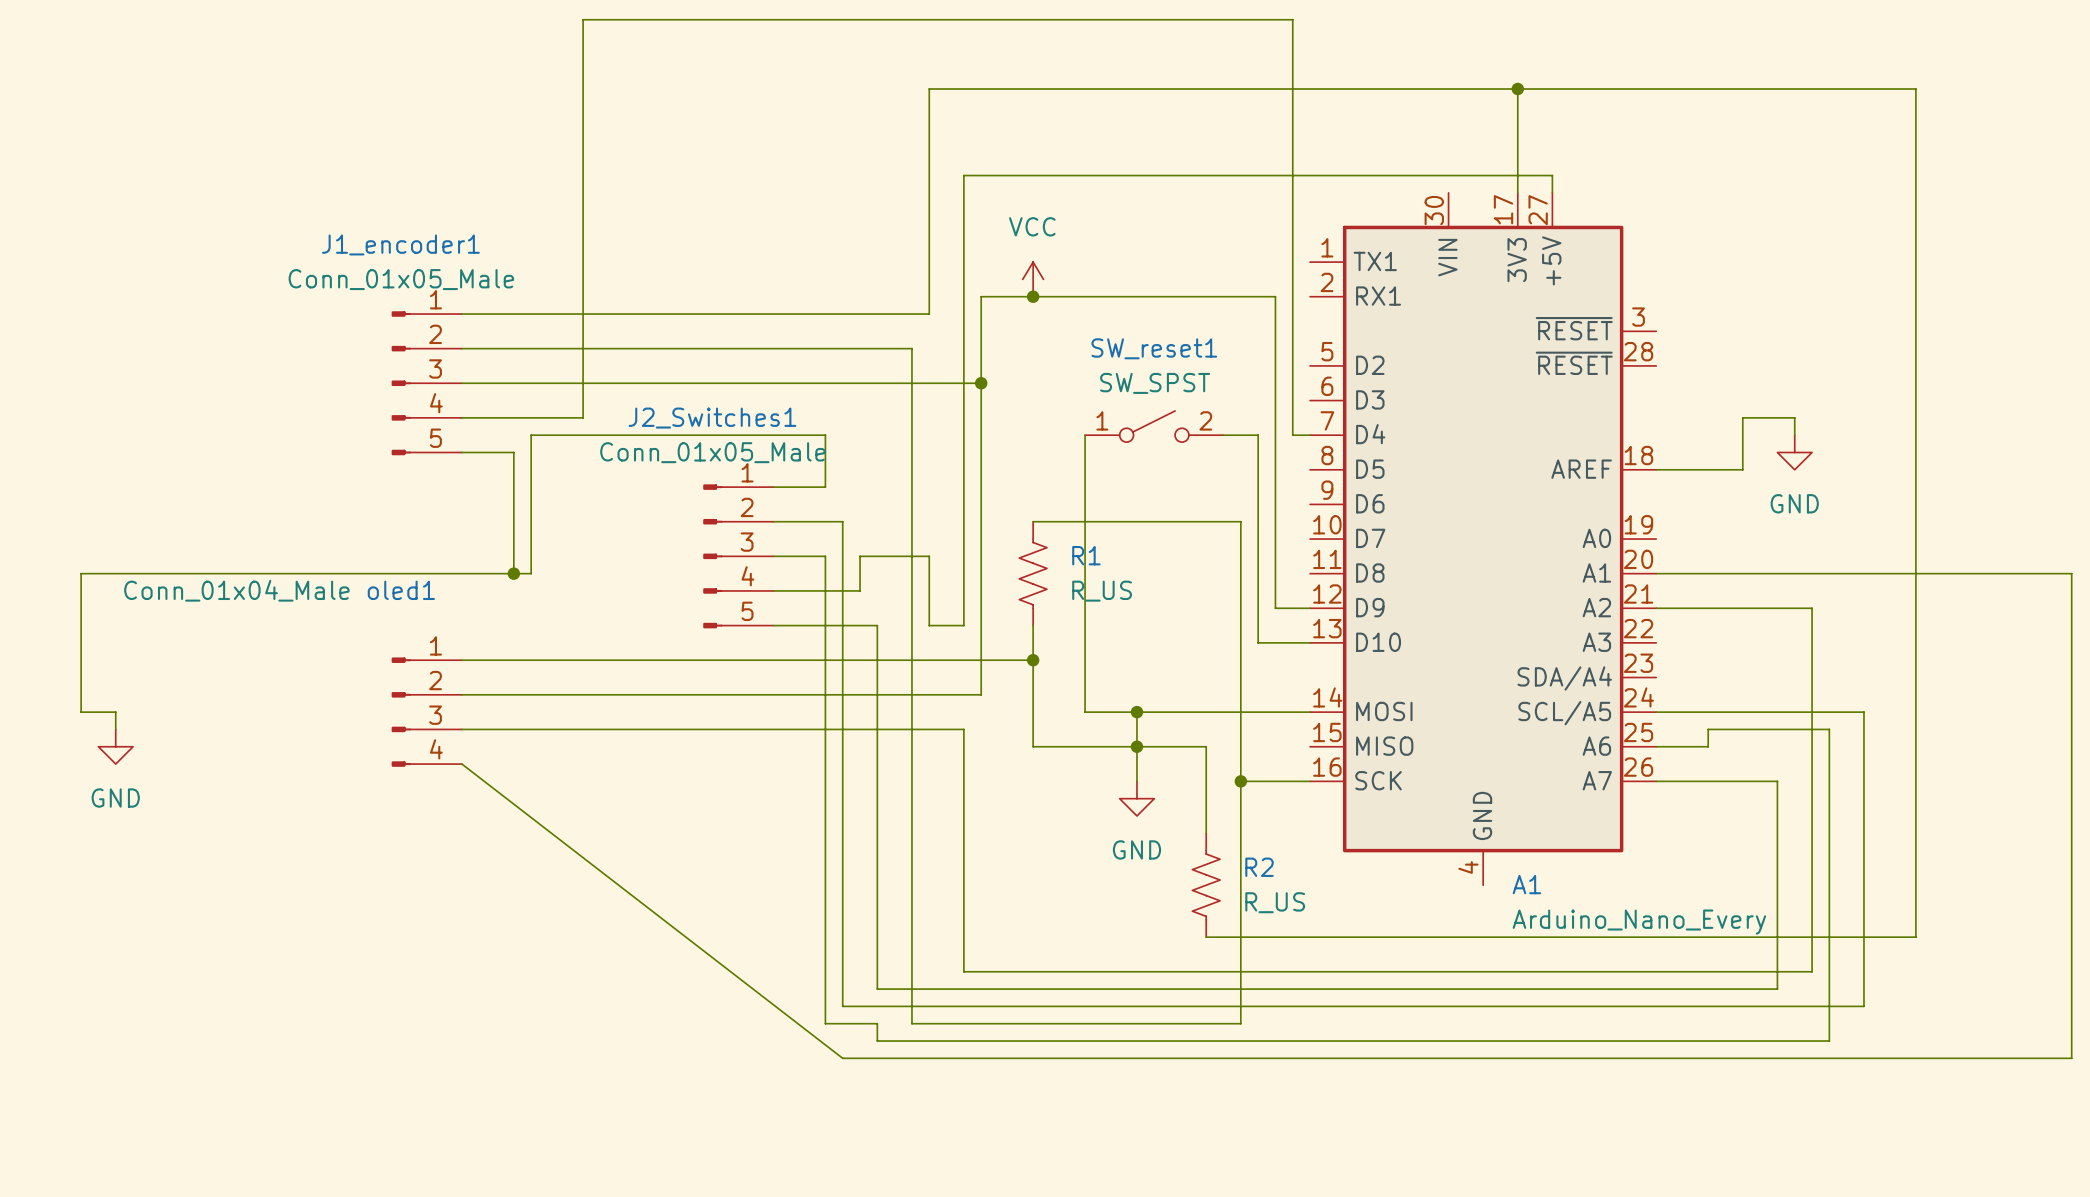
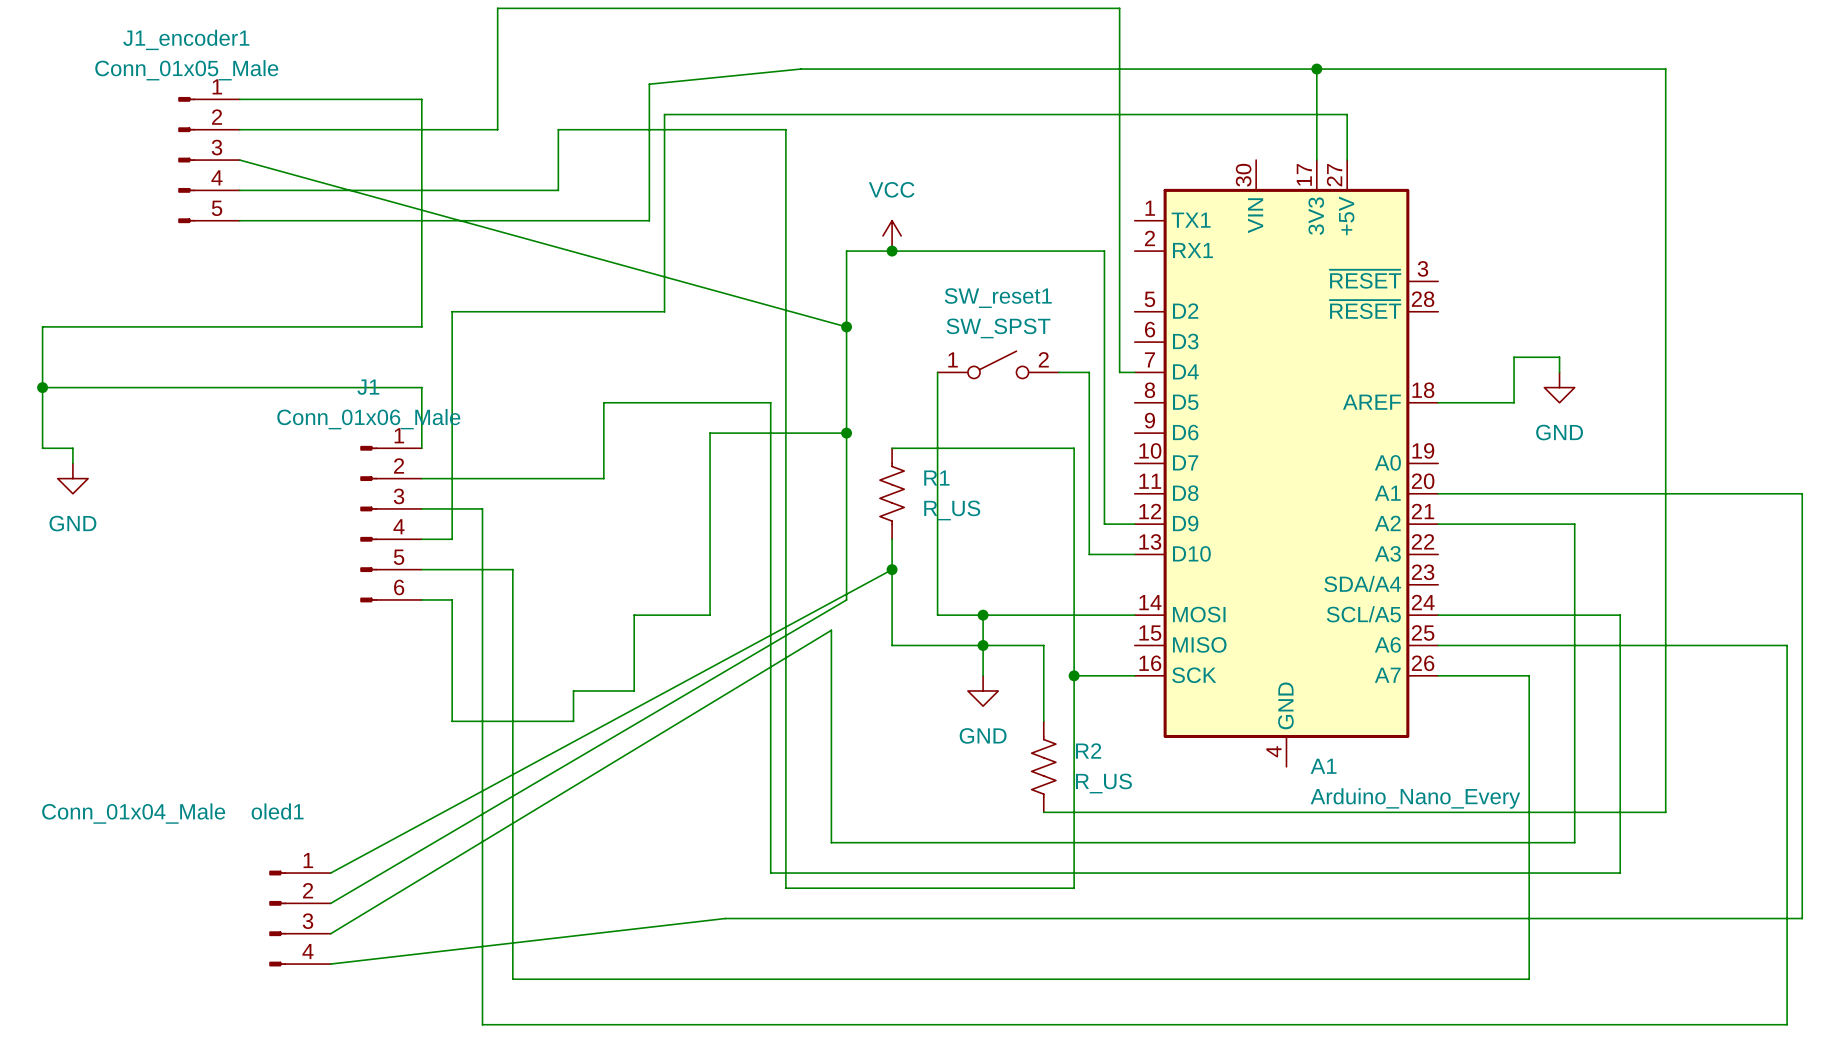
wire: (929, 88) (929, 314) (461, 314) -> (801, 69) (649, 84) (649, 220) (239, 220)
wire: none -> (239, 99) (421, 99) (421, 326)
wire: (583, 158) (583, 417) (461, 417) -> (497, 129) (239, 129)
wire: (1552, 175) (963, 175) (963, 625) (929, 625) (929, 556) (860, 556) (860, 590) (773, 590) -> (1347, 144) (1347, 114) (664, 114) (664, 311) (452, 311) (452, 372)
wire: (461, 348) (911, 348) -> (239, 190) (558, 190) (558, 129) (785, 129) (785, 296)
J1_encoder1 position: (426, 383) -> (208, 160)
wire: none -> (391, 326) (42, 326) (42, 448) (72, 448) (72, 463)
wire: (496, 383) (981, 383) -> (239, 160) (846, 326)
wire: (531, 435) (825, 435) (825, 487) (773, 487) -> none
wire: none -> (42, 387) (391, 387)
junction: none -> (42, 387)
wire: (496, 452) (513, 452) (513, 573) -> (421, 387) (421, 448)
junction: none -> (846, 433)
wire: (773, 521) (842, 521) (842, 1006) (894, 1006) -> (421, 478) (603, 478) (603, 402) (770, 402) (770, 873)
J2_Switches1: Conn_01x05_Male (738, 556) -> none
wire: (773, 556) (825, 556) -> (846, 433) (710, 433) (710, 478)
junction: (513, 573) -> none
wire: (531, 573) (81, 573) (81, 712) (115, 712) (115, 729) -> (452, 493) (452, 539) (421, 539)
J1: none -> Conn_01x06_Male (391, 524)
wire: (773, 625) (877, 625) (877, 989) (1777, 989) (1777, 781) (1760, 781) -> (512, 569) (512, 979) (1529, 979) (1529, 675)
wire: (600, 660) (1033, 660) -> (330, 873) (892, 569)
wire: (531, 694) (981, 694) -> (452, 599) (452, 721) (573, 721) (573, 690) (634, 690) (634, 615) (710, 615)
wire: none -> (846, 599) (330, 903)
oled1 position: (426, 712) -> (300, 918)
wire: (825, 712) (825, 1023) (877, 1023) (877, 1041) (1829, 1041) (1829, 729) (1708, 729) (1708, 746) -> (421, 508) (482, 508) (482, 1024) (1787, 1024) (1787, 645) (1483, 645)
wire: (461, 729) (963, 729) -> (330, 933) (831, 630)
power symbol position: GND (115, 746) -> GND (72, 478)
wire: (461, 764) (842, 1058) -> (330, 964) (725, 918)

